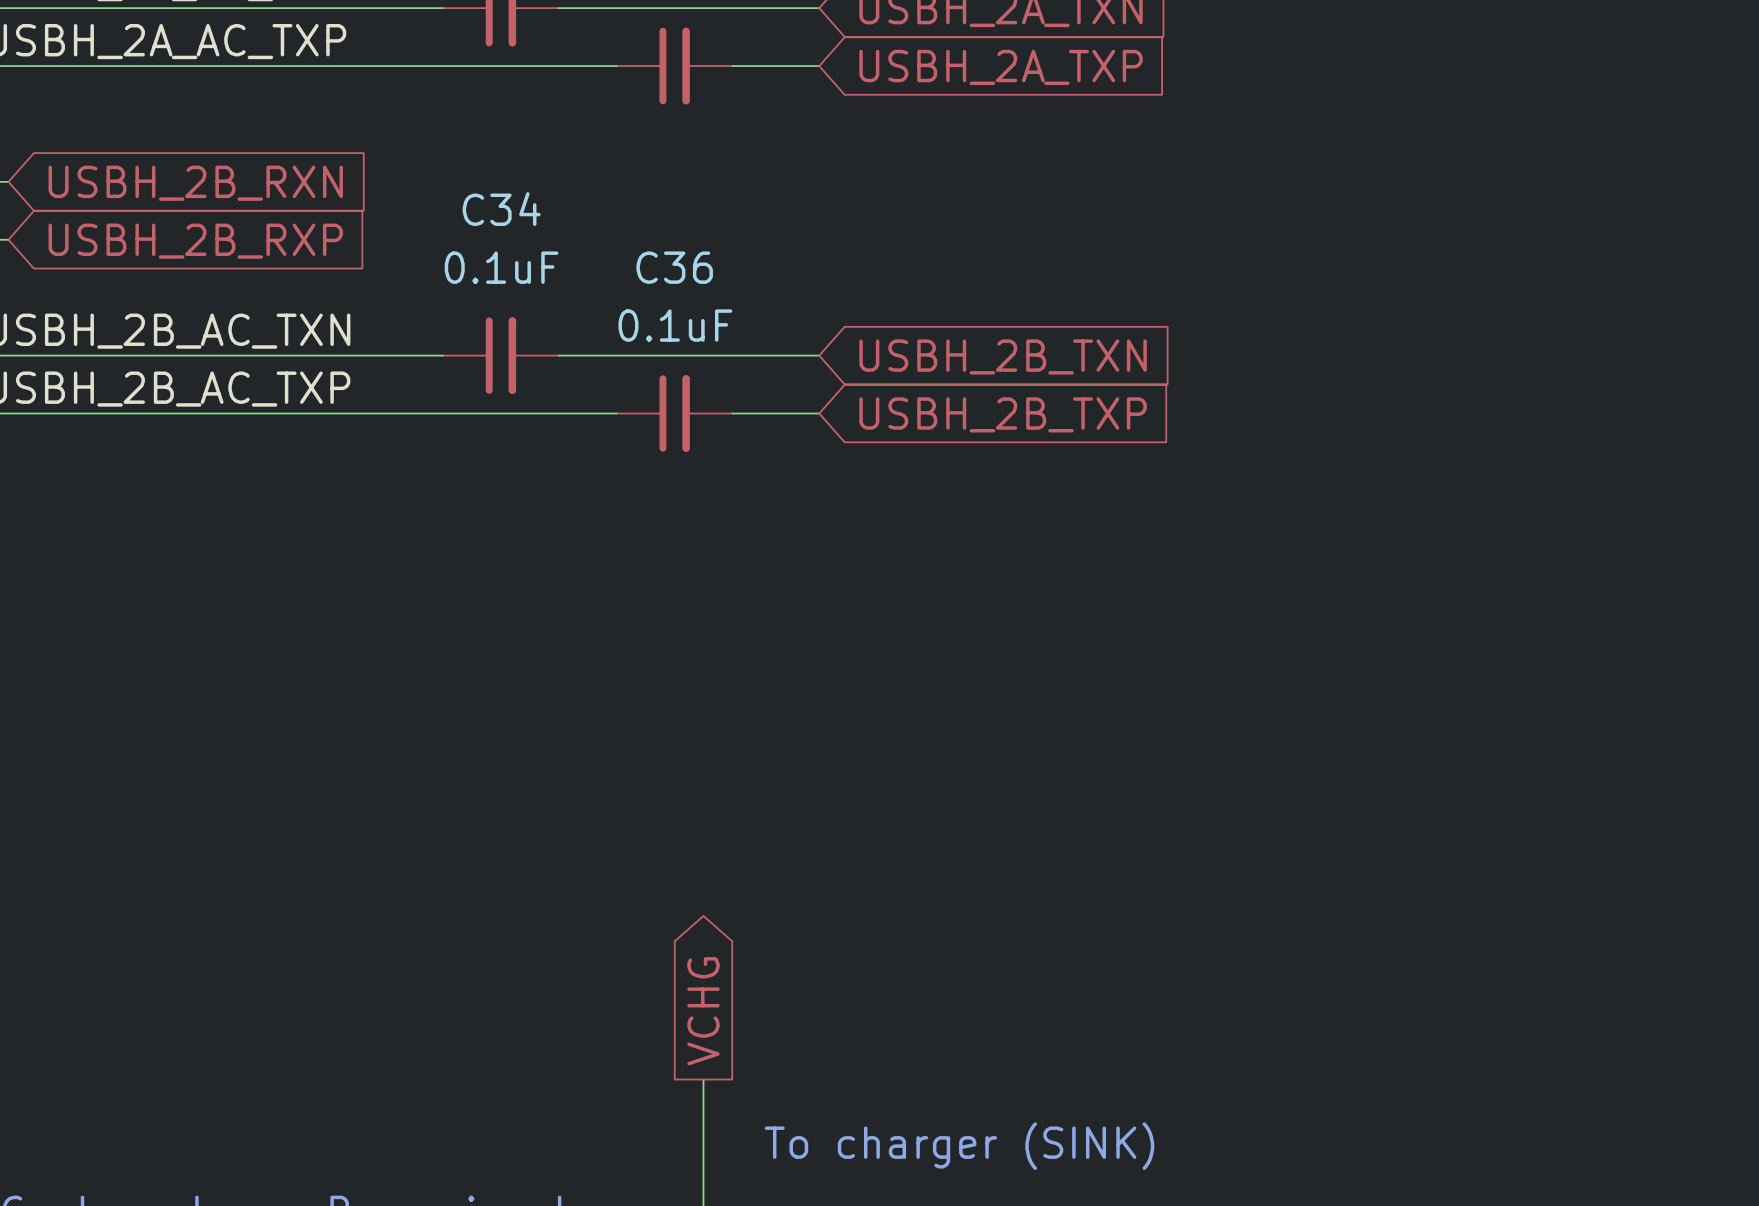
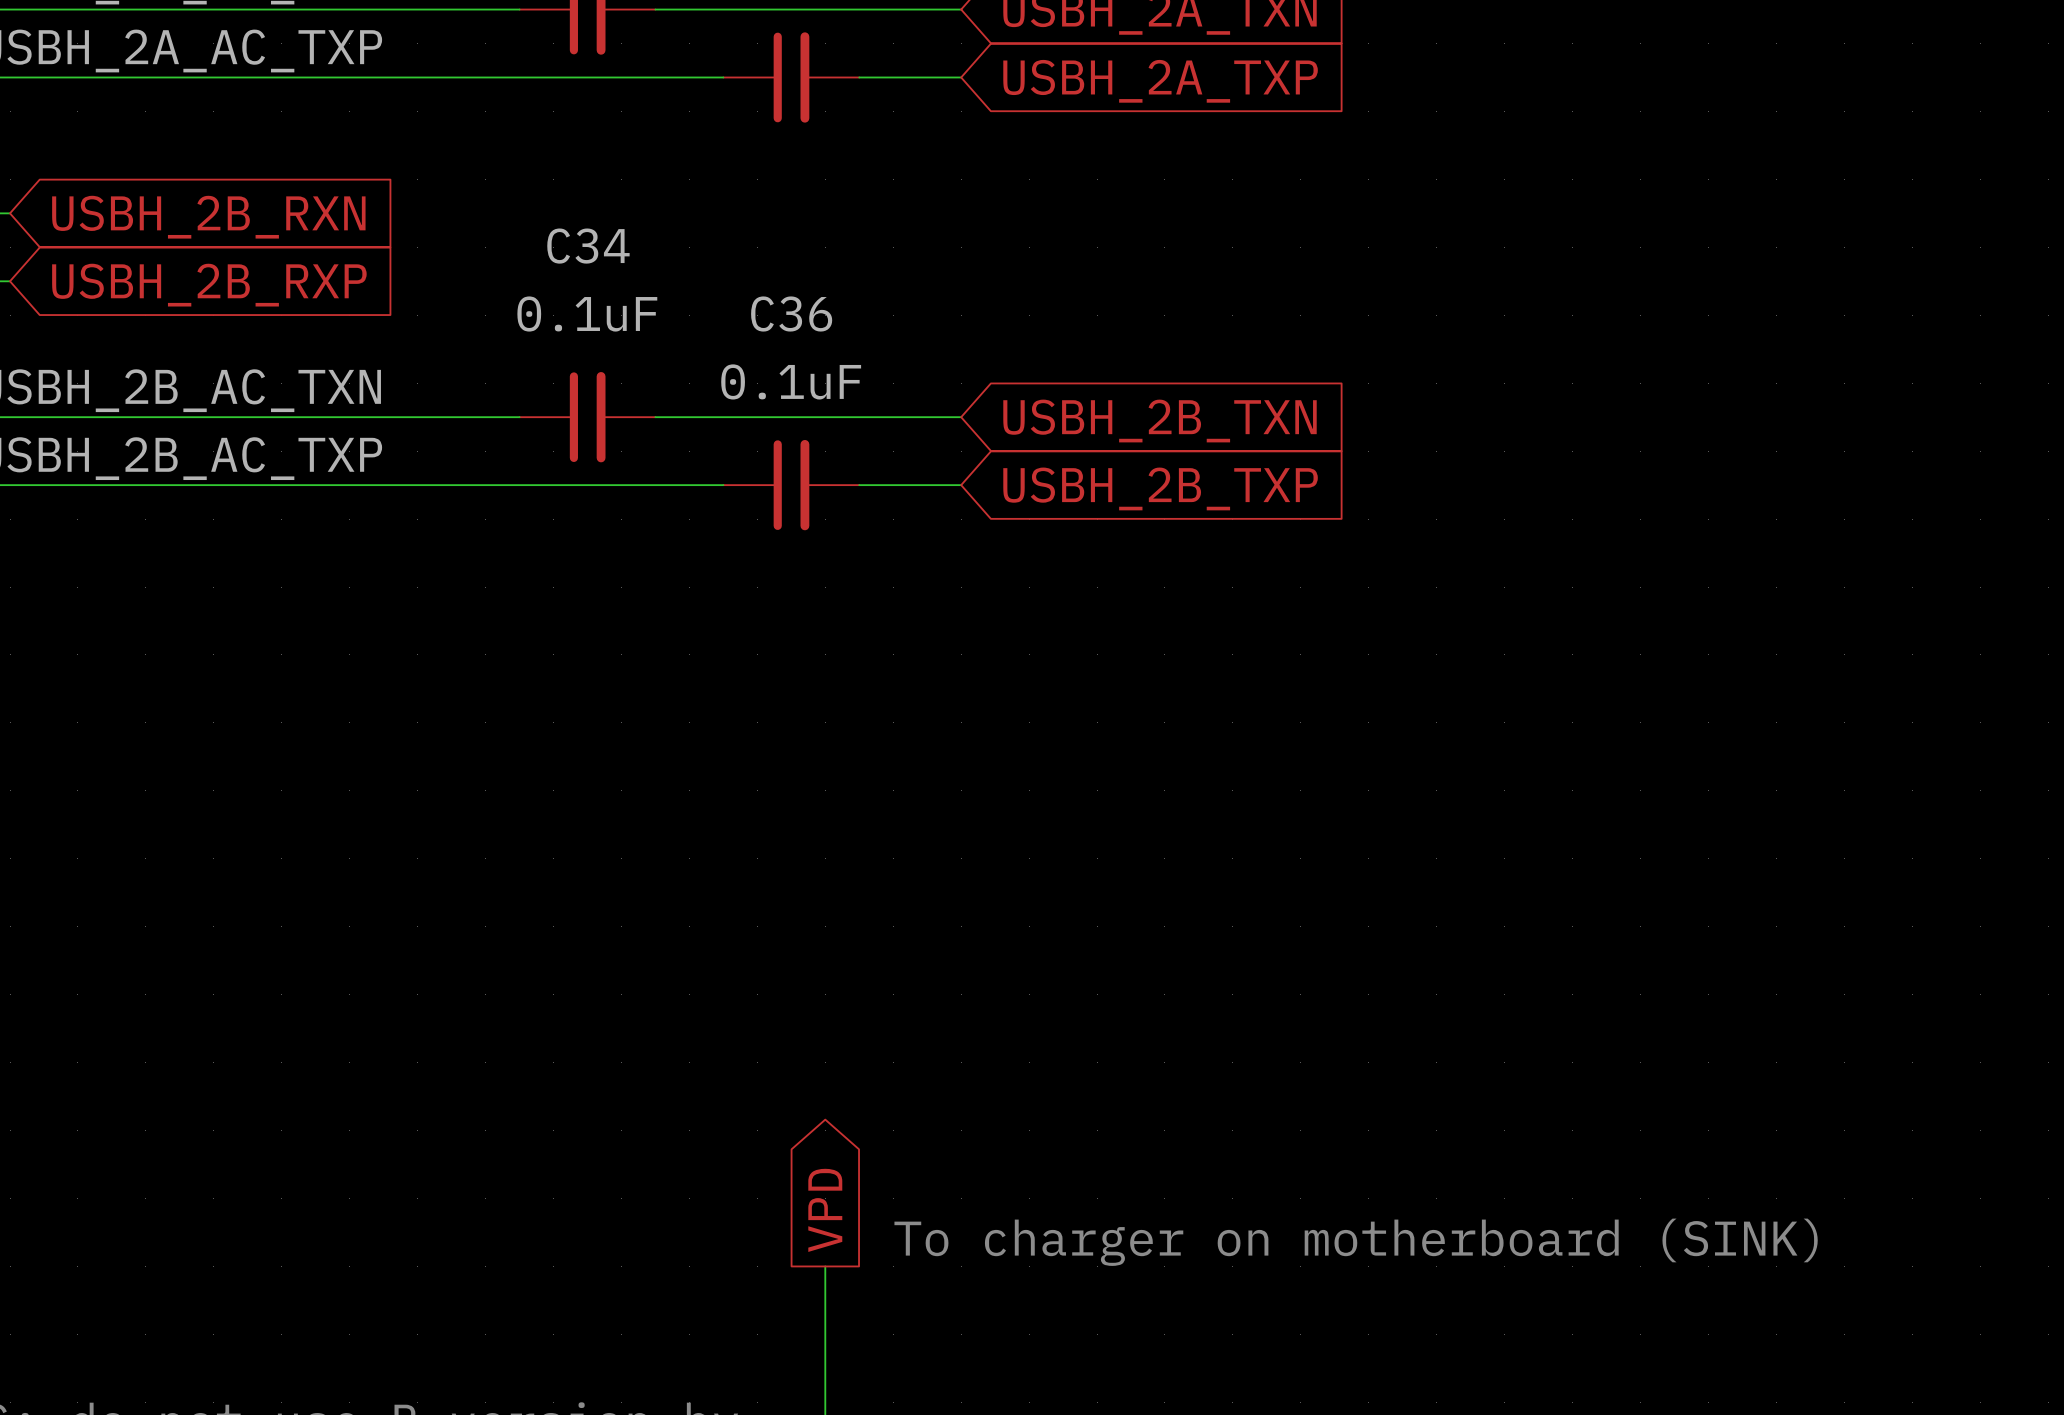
global label: VCHG (703, 1011) -> VPD (825, 1210)
text: none -> To charger on motherboard (SINK) (1356, 1242)
text: To charger (SINK) (959, 1146) -> none

